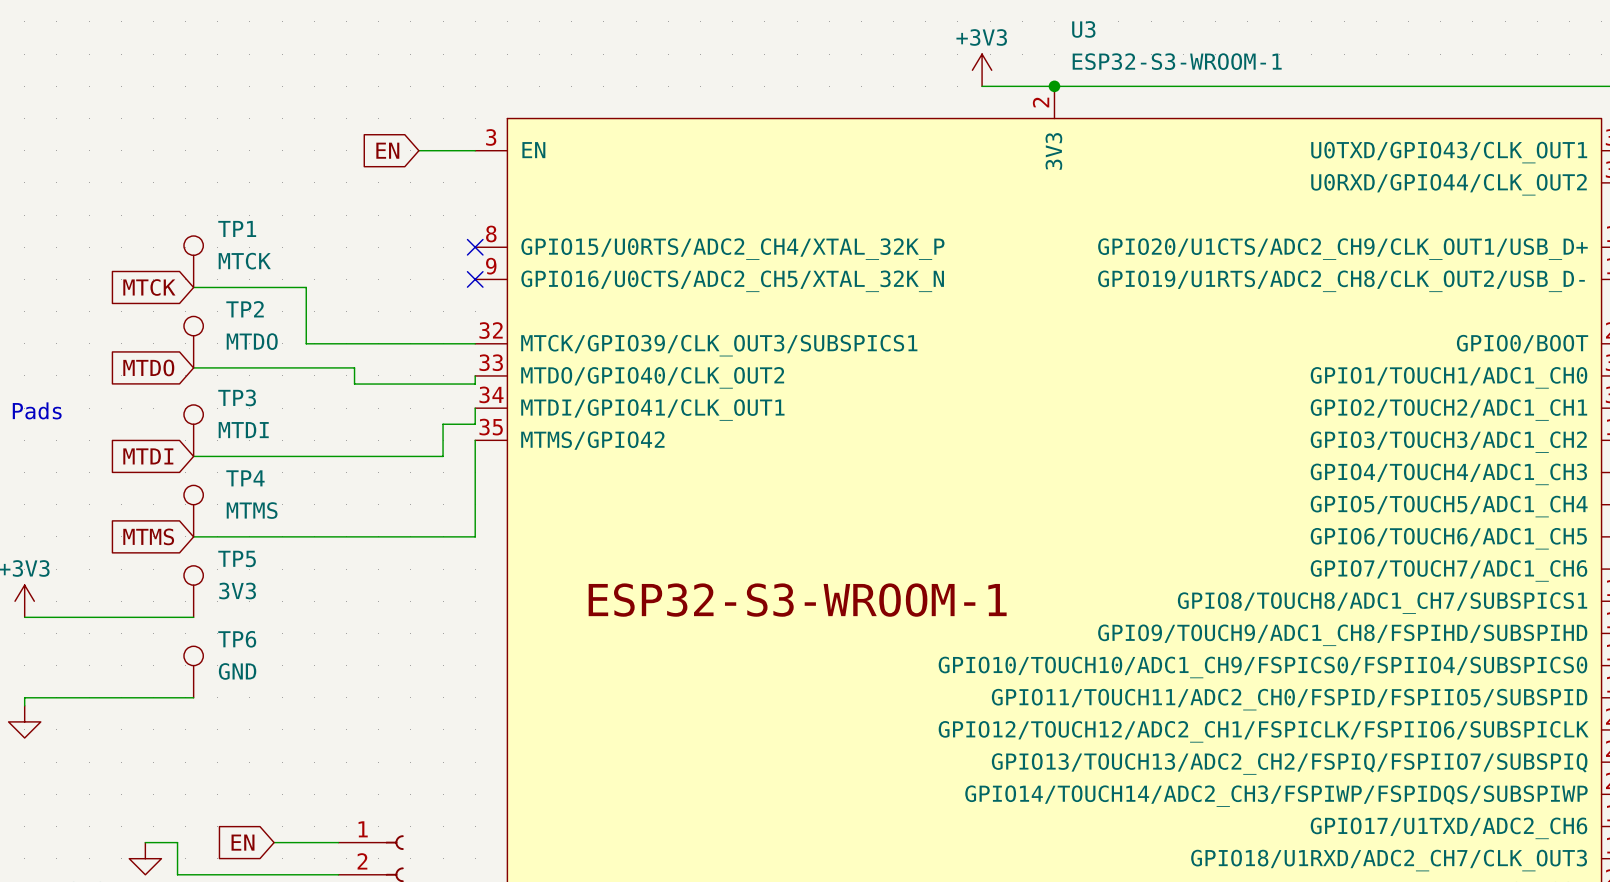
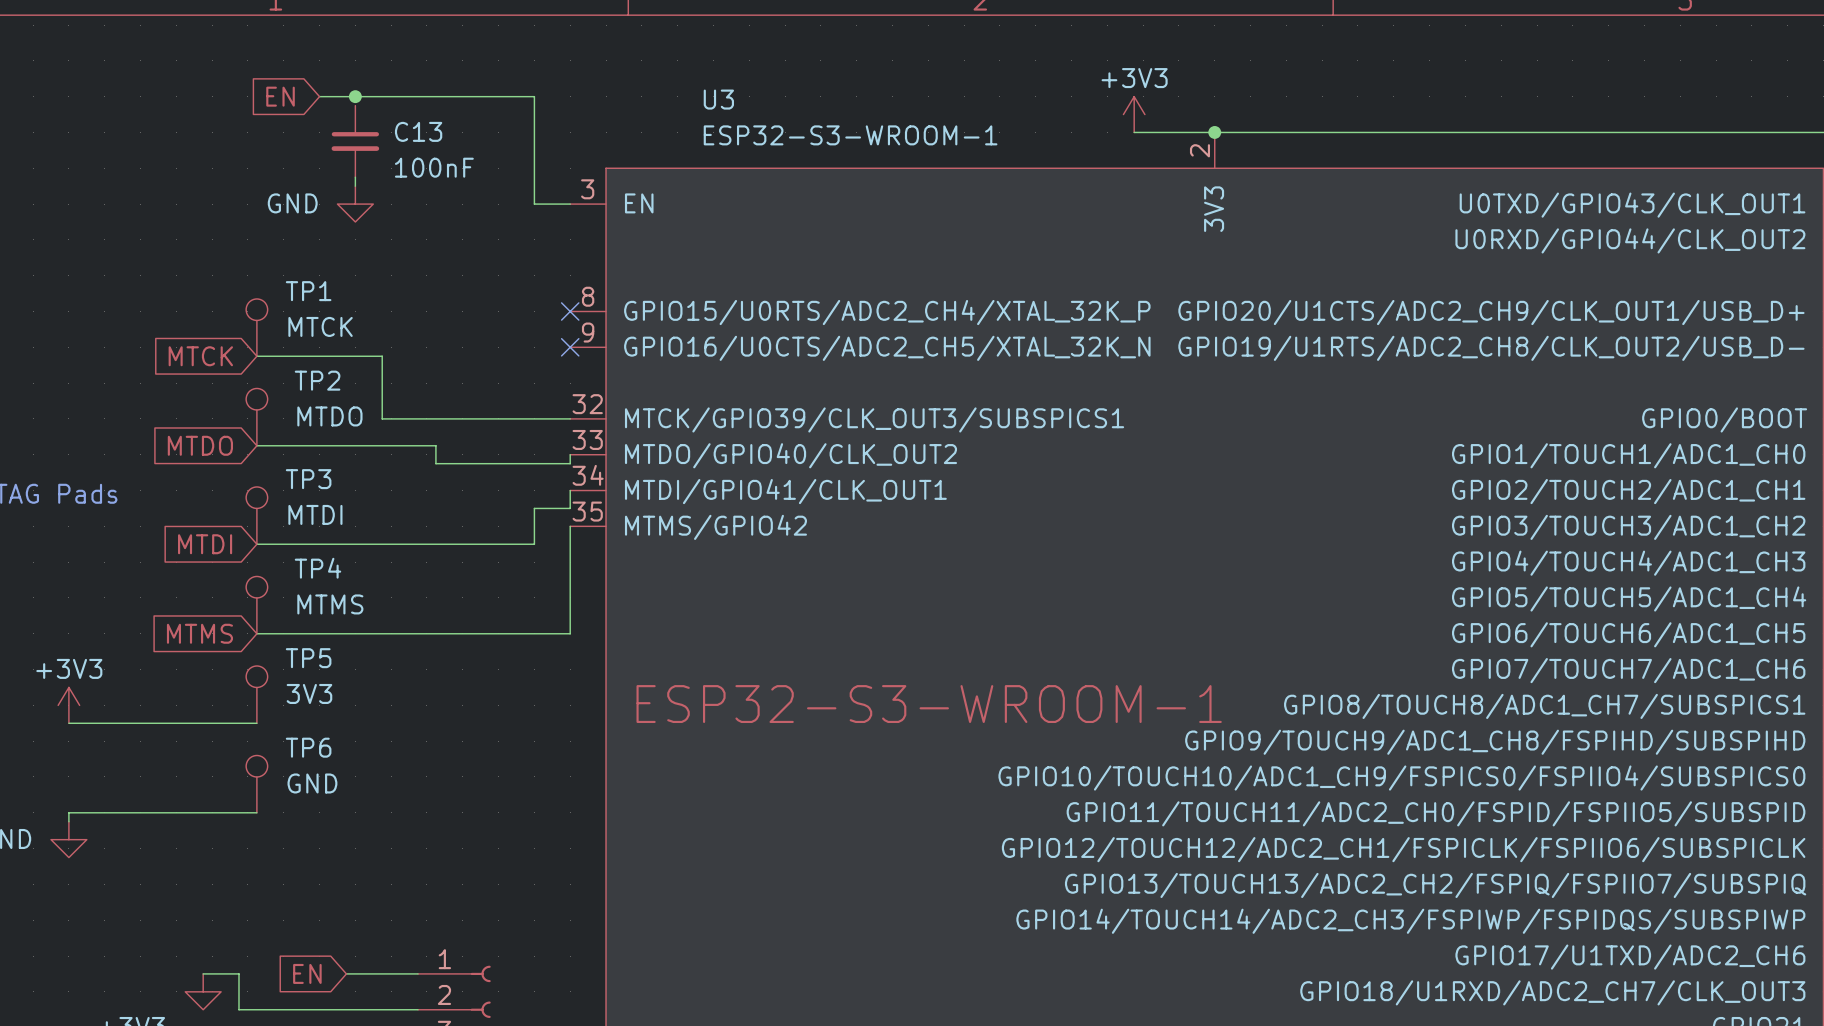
U3 name position: U3 (1083, 29) -> U3 (718, 99)
junction: none -> (355, 96)
U3 value position: ESP32-S3-WROOM-1 (1177, 61) -> ESP32-S3-WROOM-1 (850, 135)
C13: none -> 100nF (355, 141)
wire: none -> (355, 177) (355, 186)
power symbol: none -> GND (355, 204)
global label position: EN (387, 150) -> EN (280, 96)
wire: (418, 150) (443, 150) -> (319, 96) (534, 96) (534, 204)

